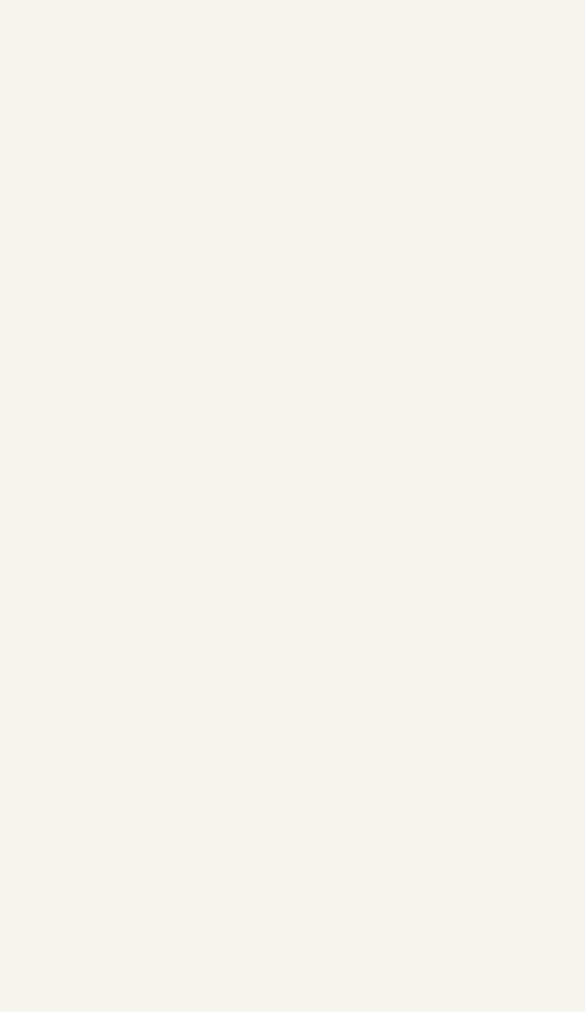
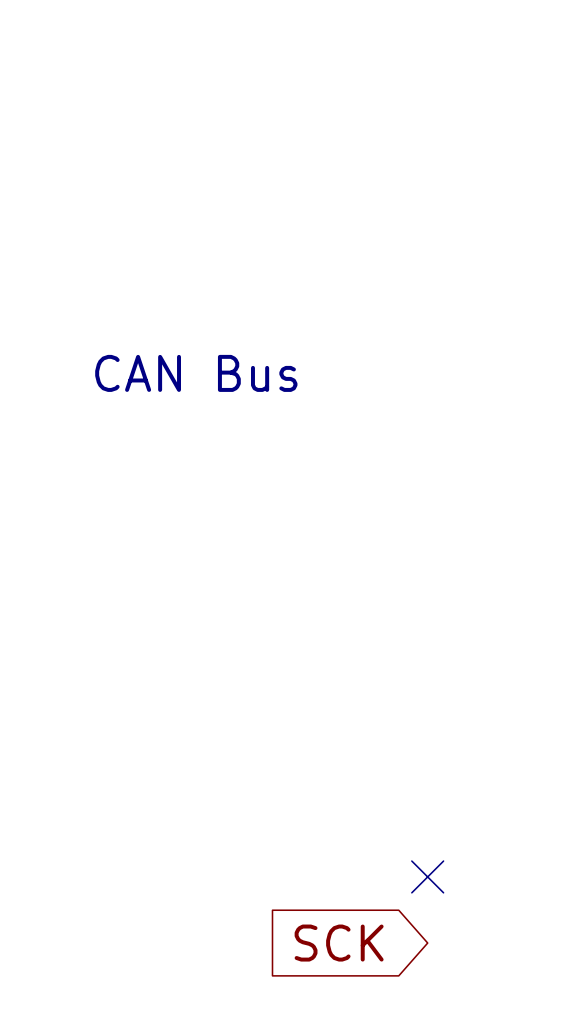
text: none -> CAN Bus (196, 373)
no-connect mark: none -> (427, 876)
global label: none -> SCK (339, 943)

